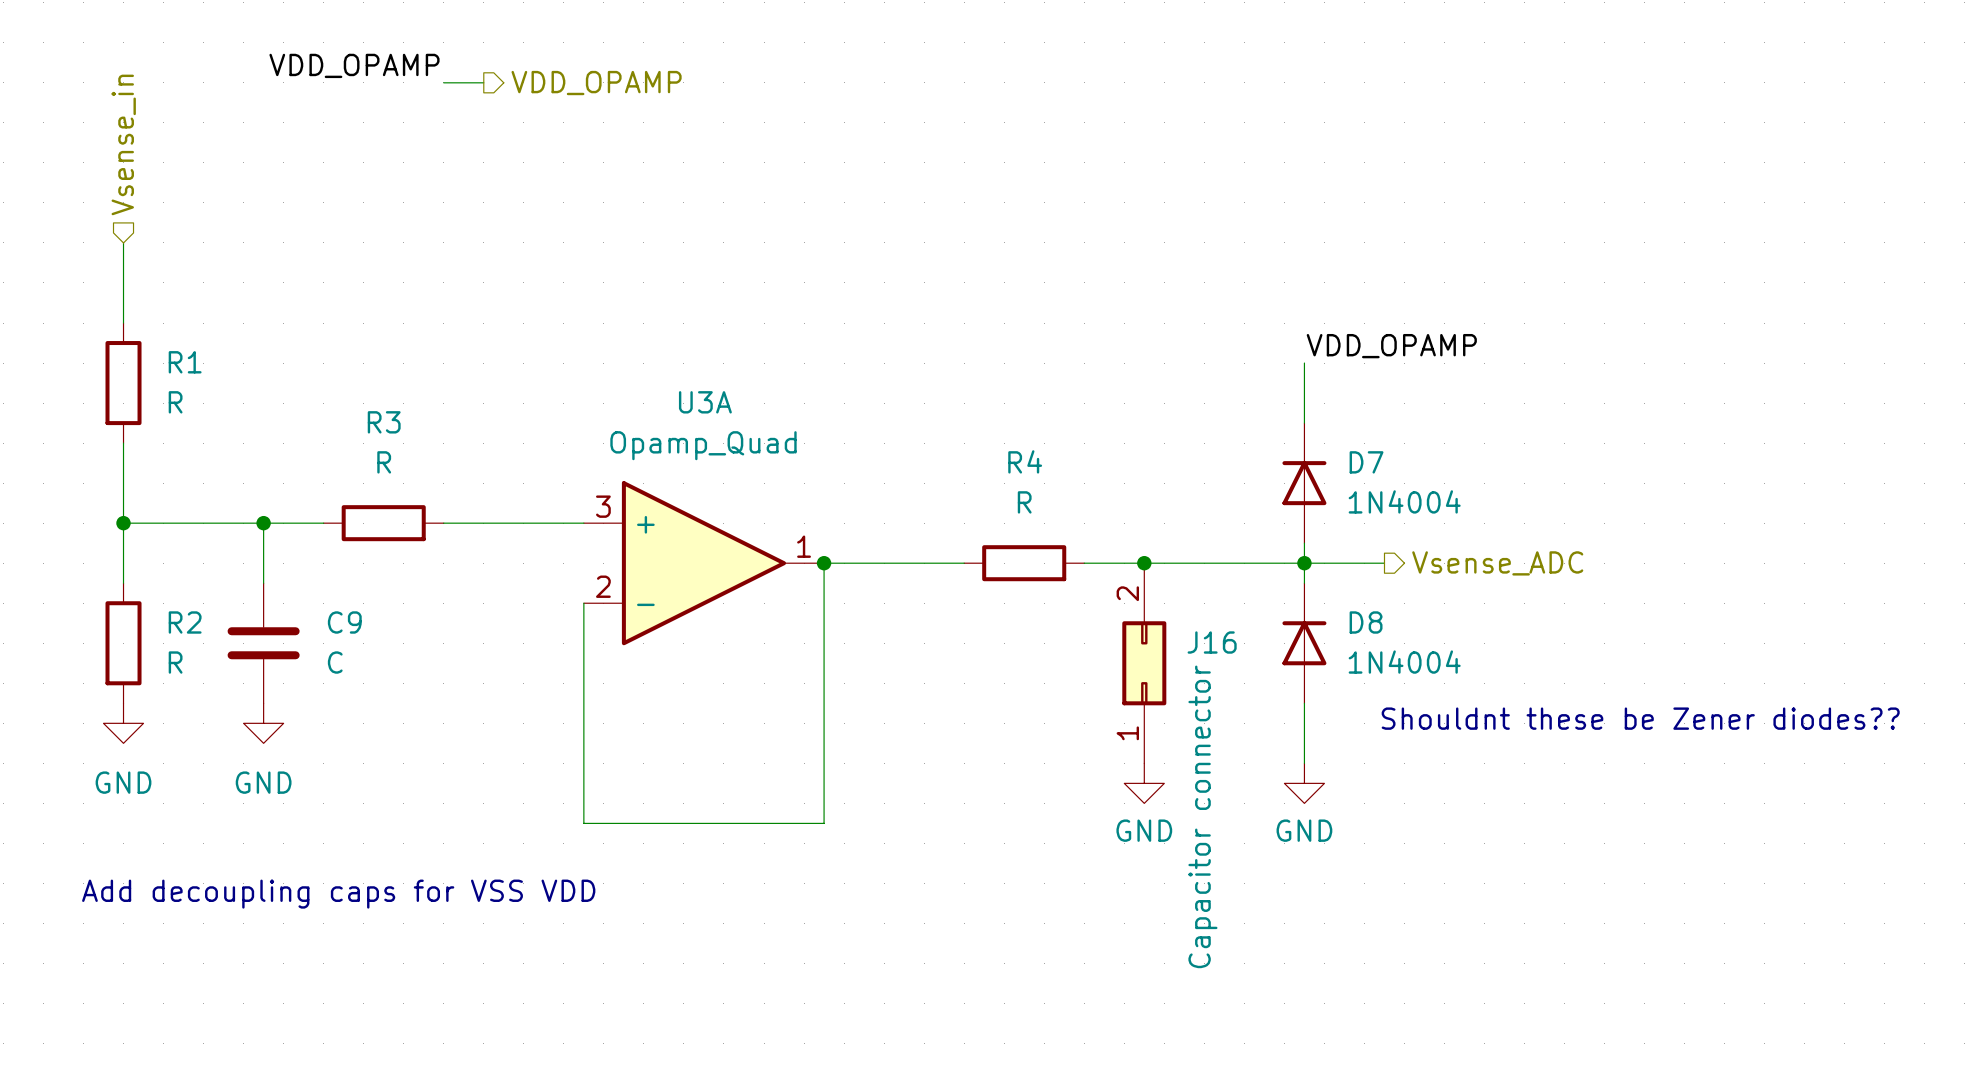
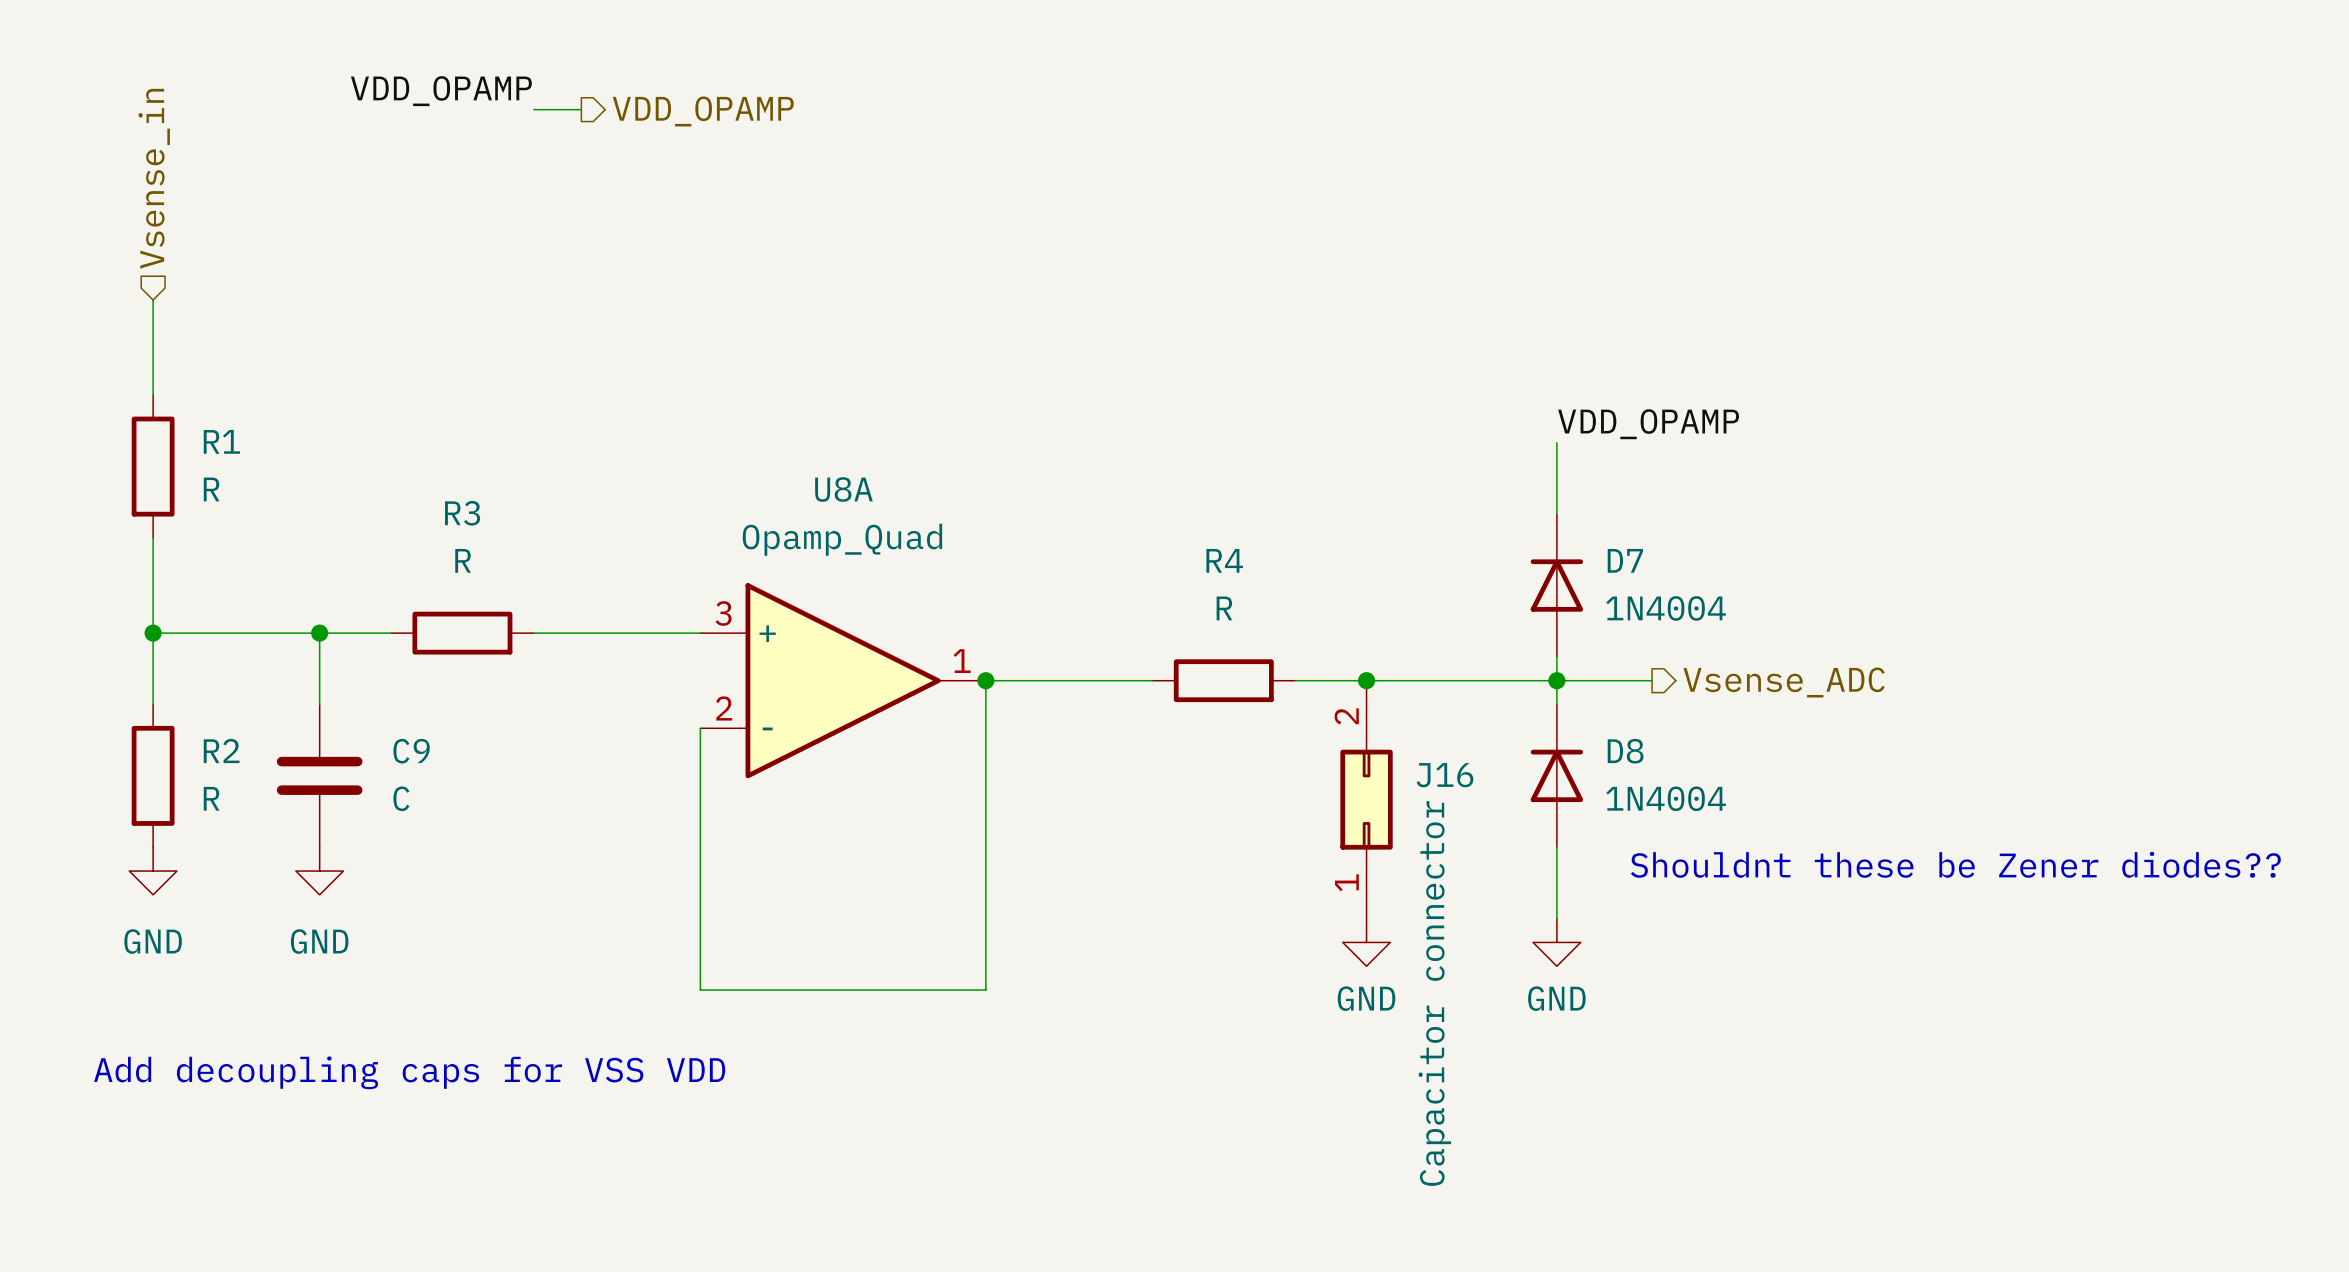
U3A name: U3A (705, 402) -> U8A (843, 489)

